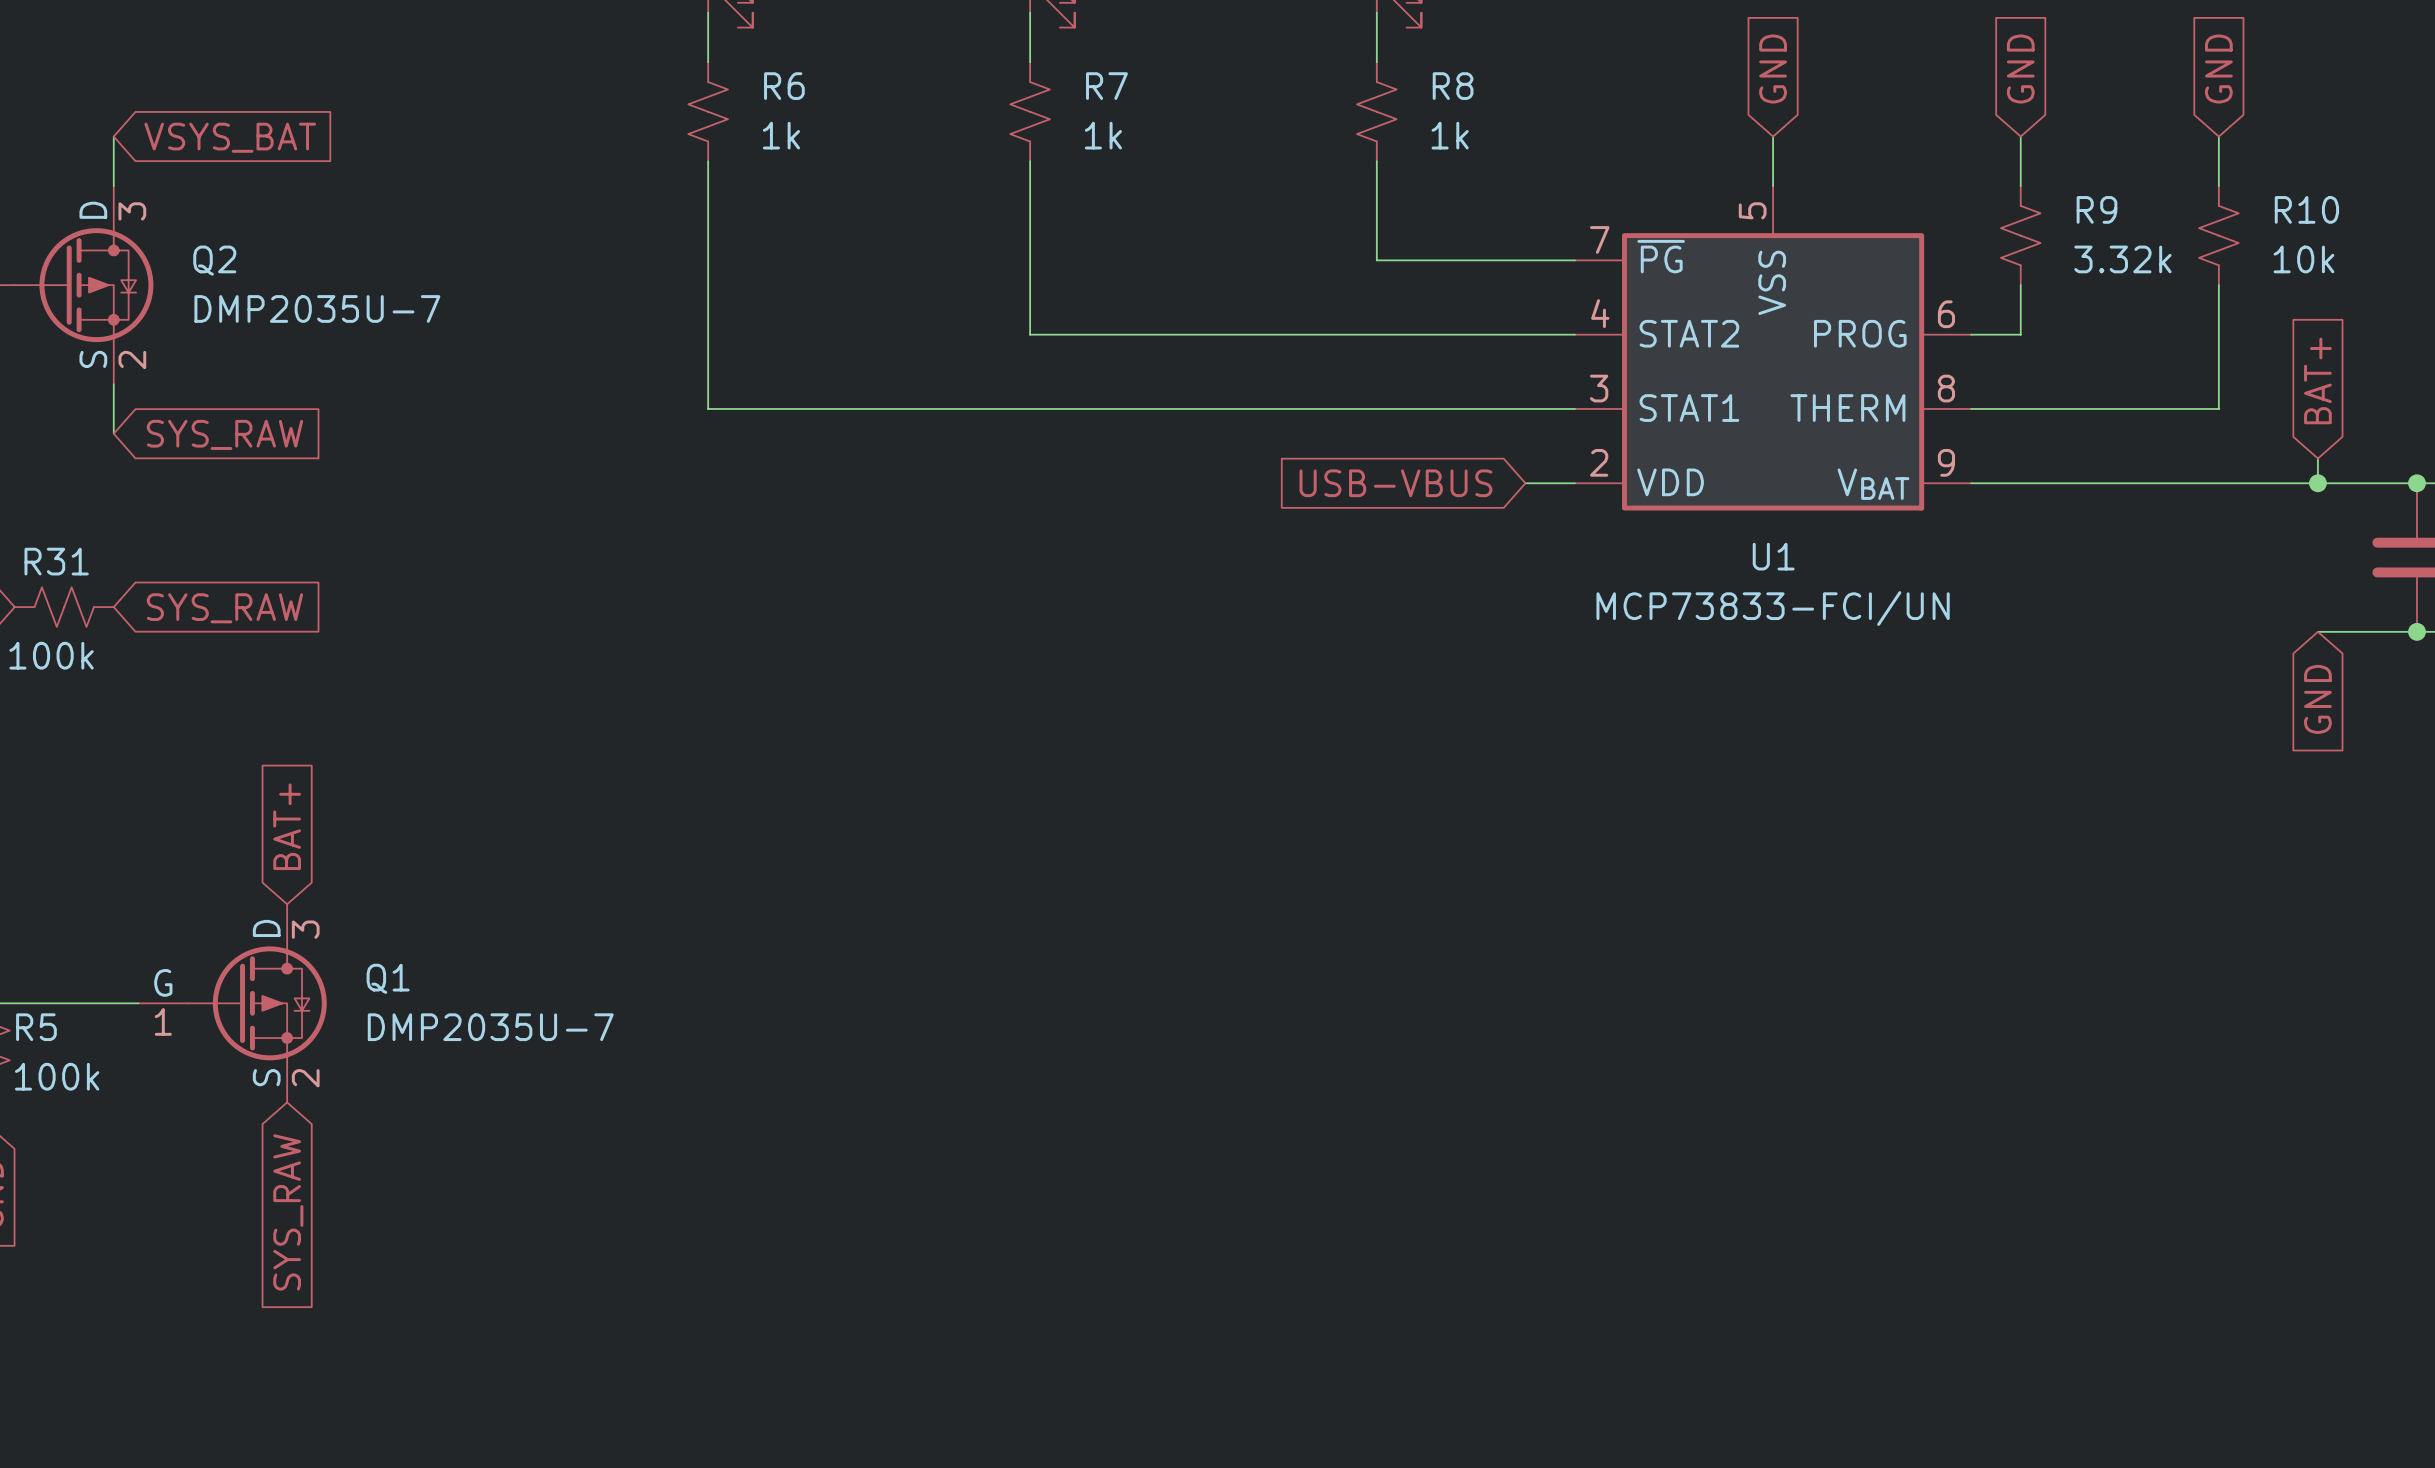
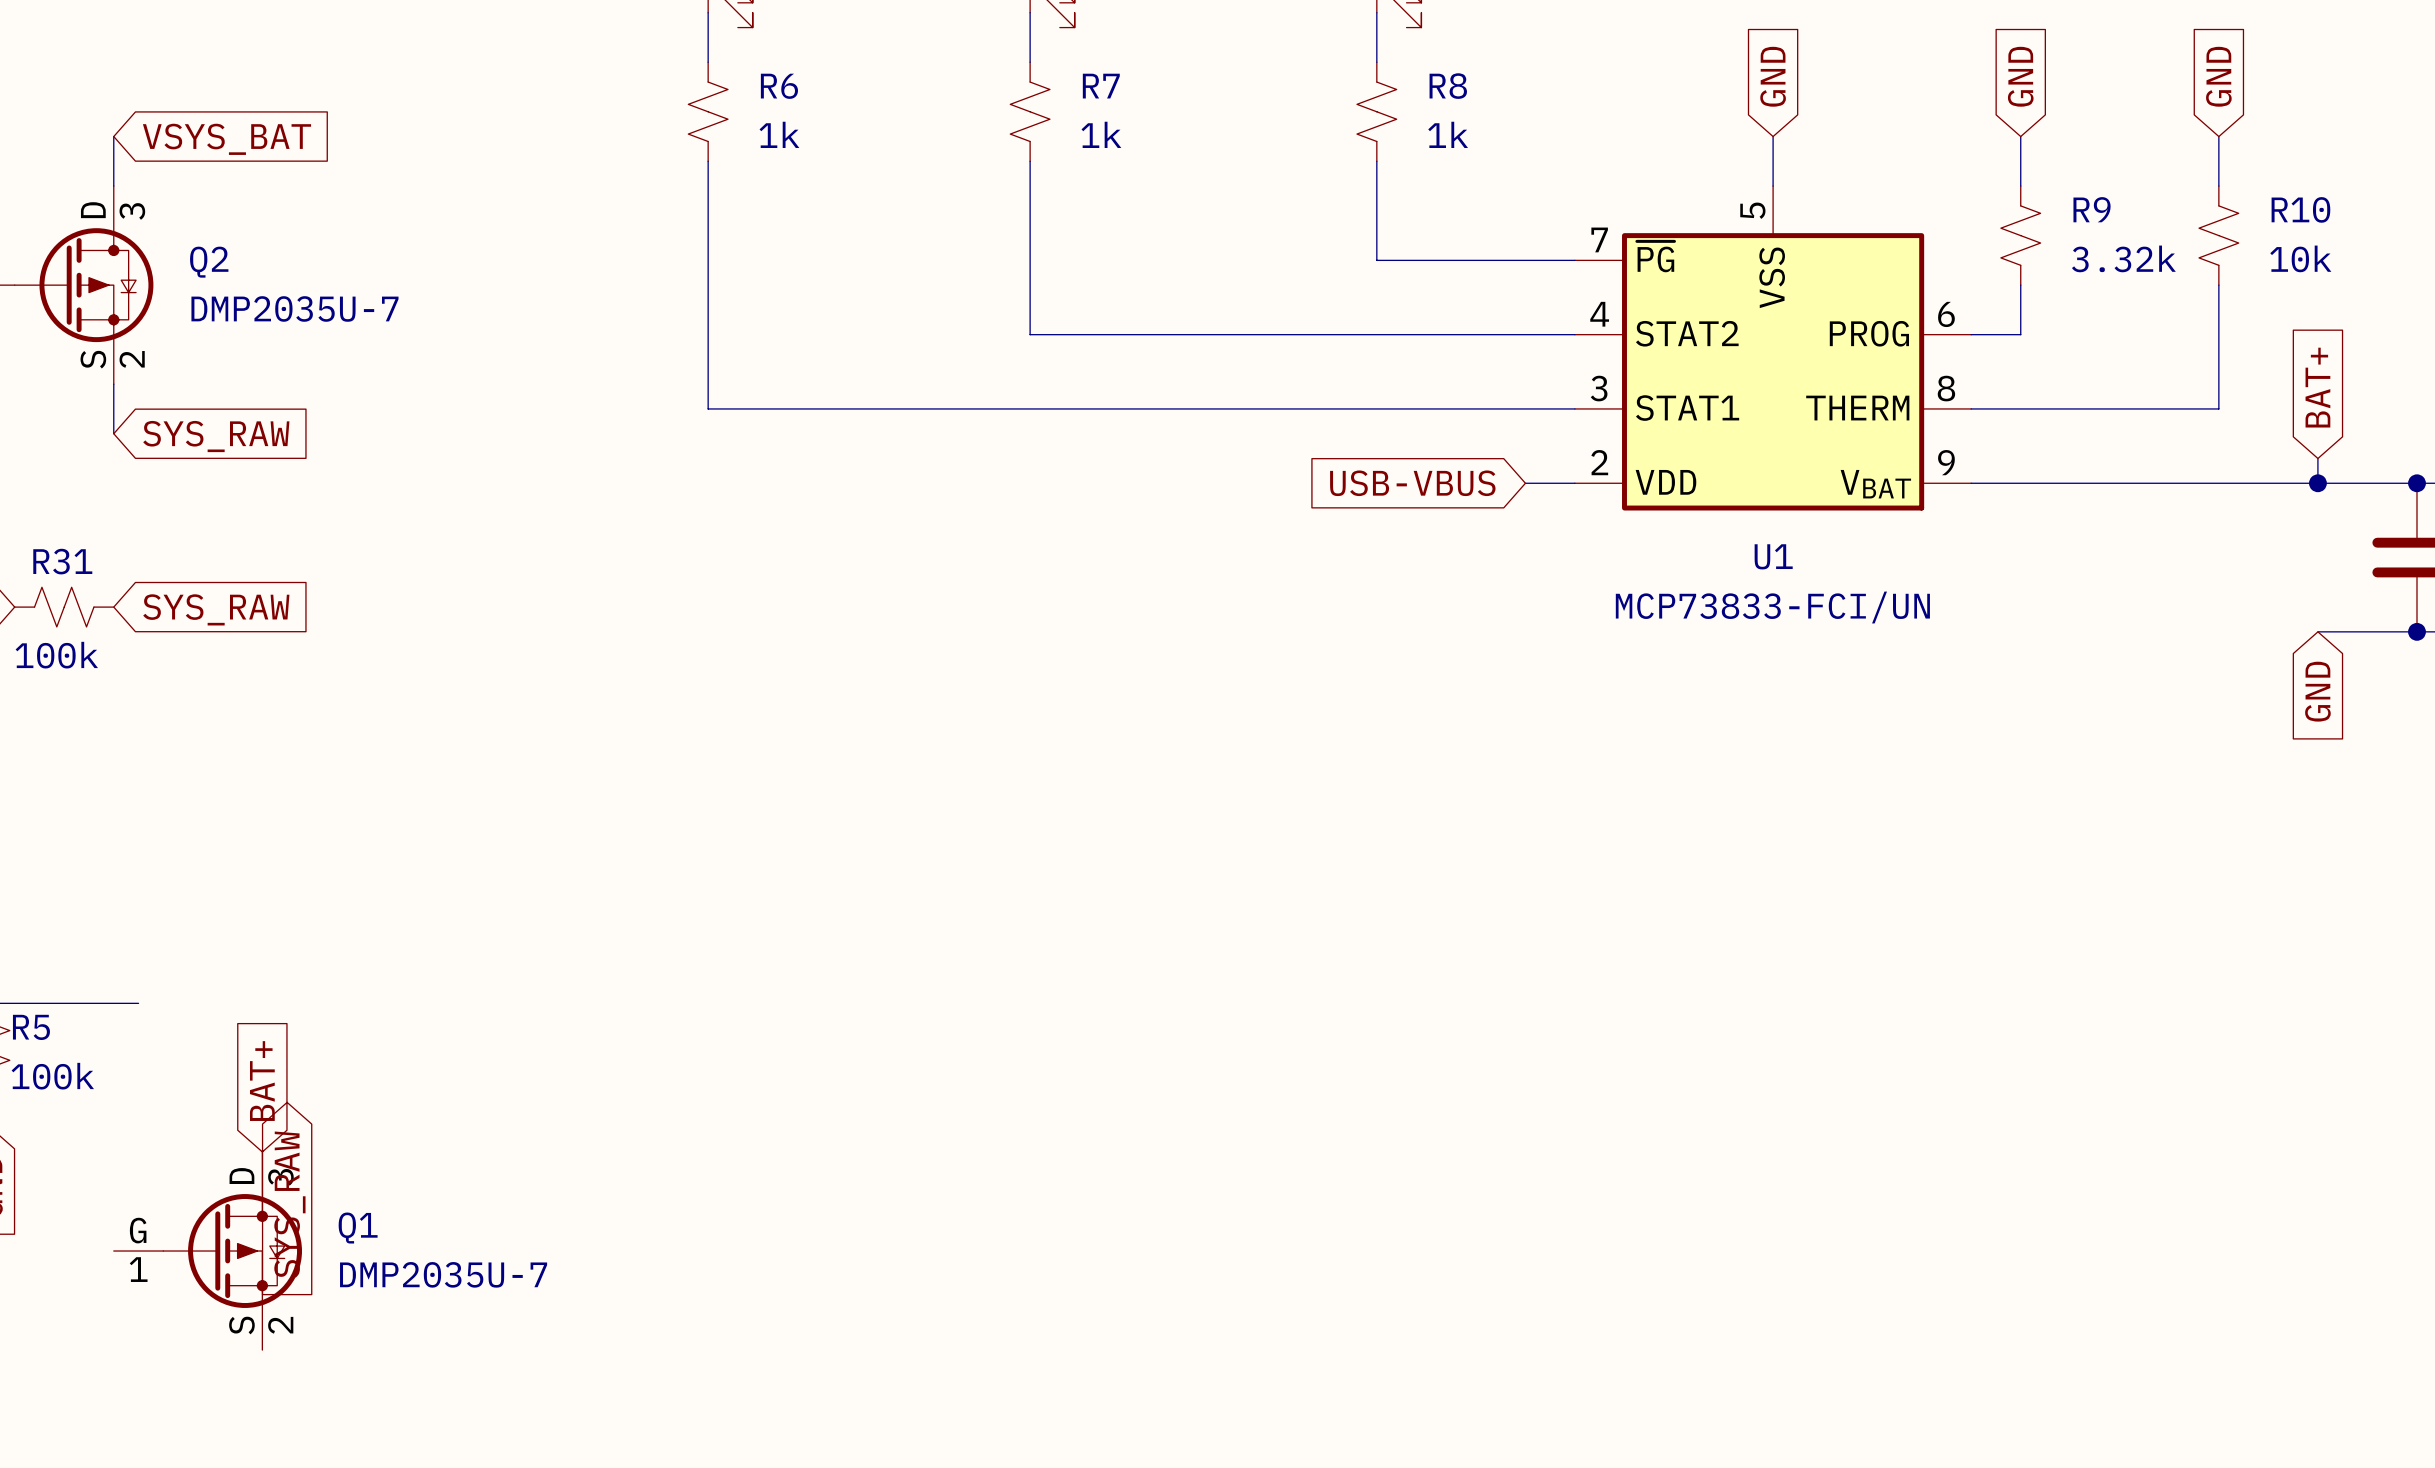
global label position: BAT+ (287, 826) -> BAT+ (262, 1081)
Q1 position: (232, 1003) -> (207, 1251)

